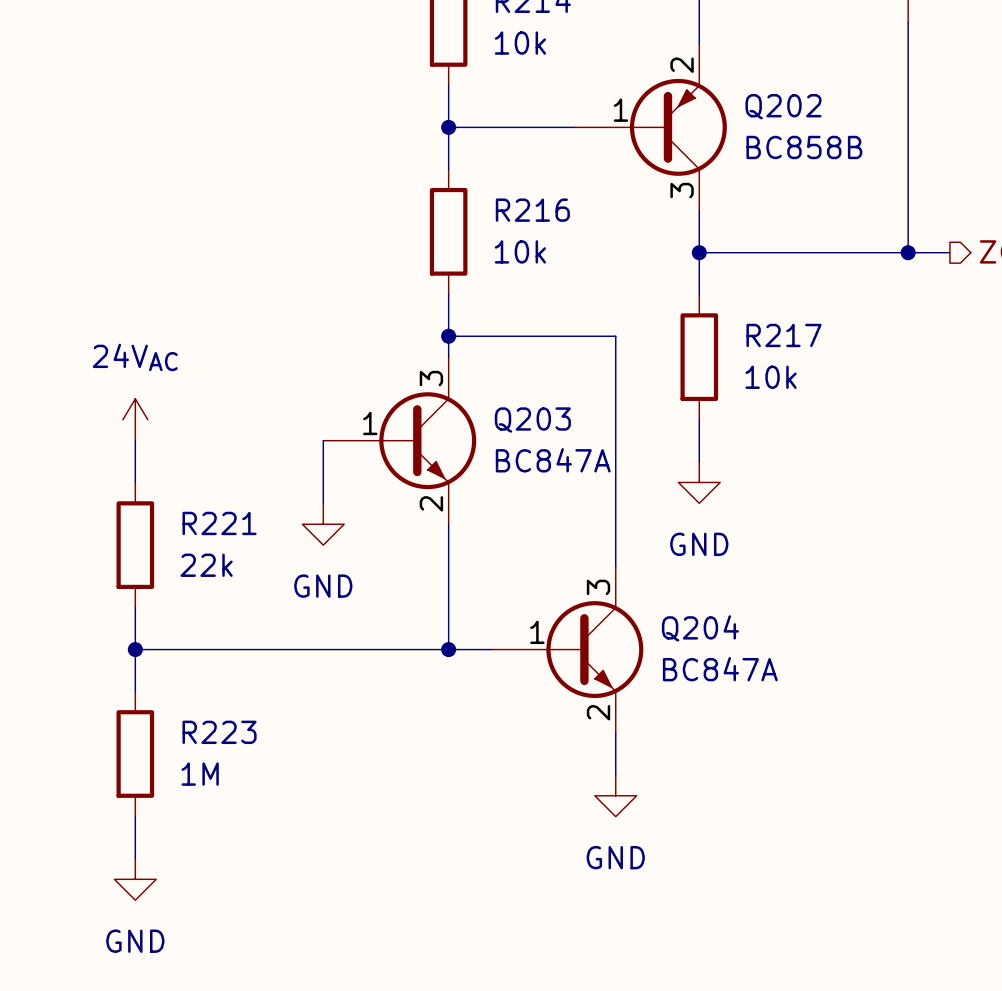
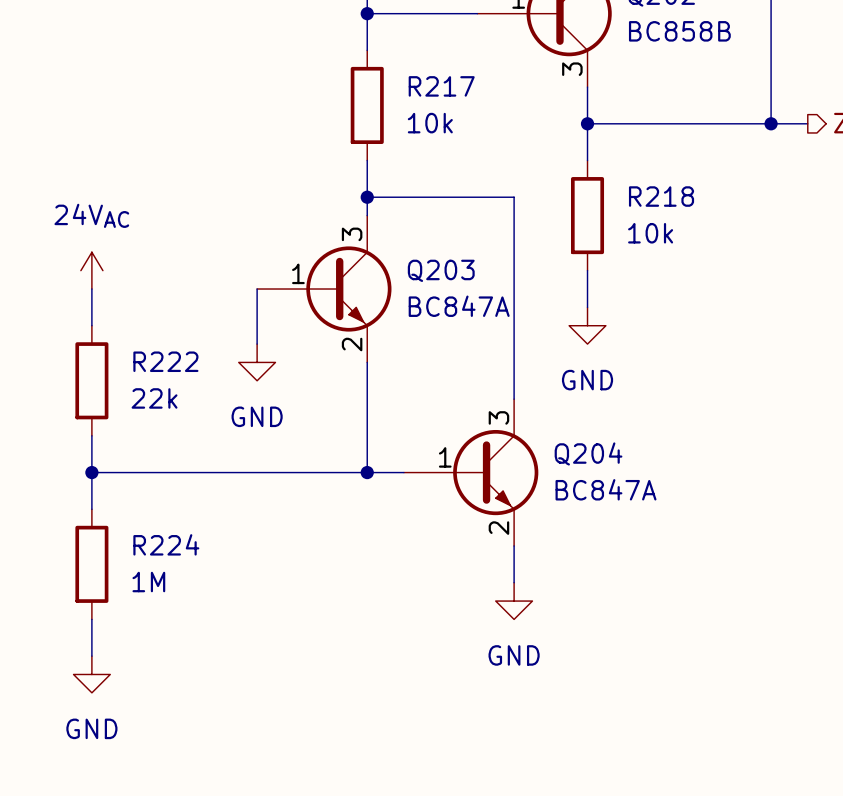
R216 name: R216 (532, 210) -> R217 (441, 86)
R217 name: R217 (783, 335) -> R218 (661, 196)
R221 name: R221 (219, 523) -> R222 (165, 361)
R223 name: R223 (219, 732) -> R224 (166, 544)

